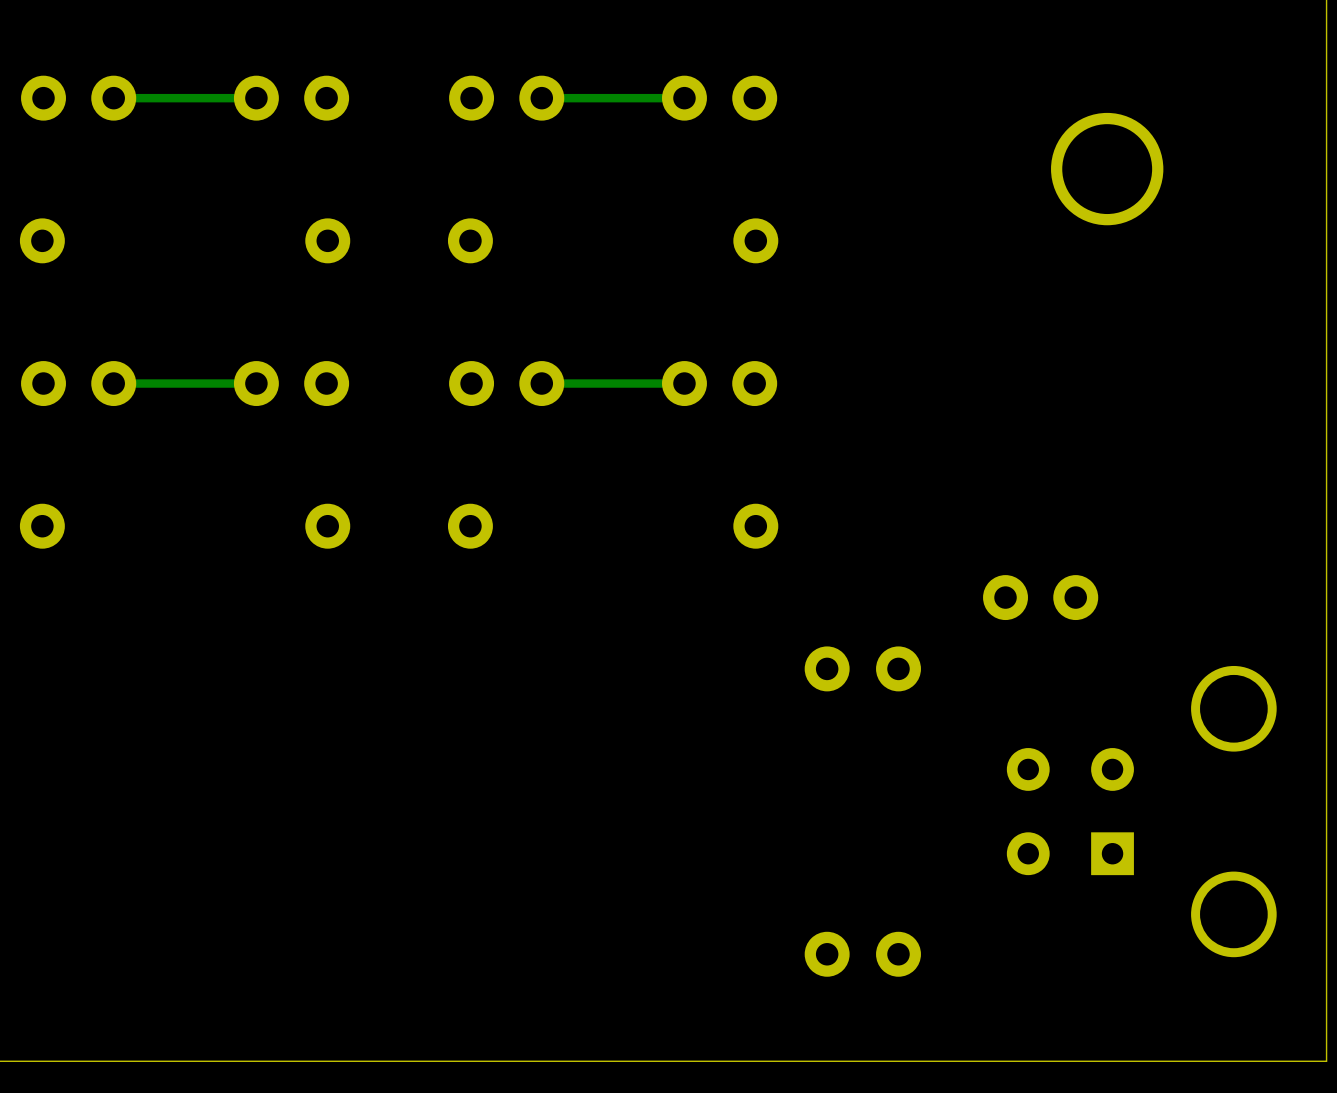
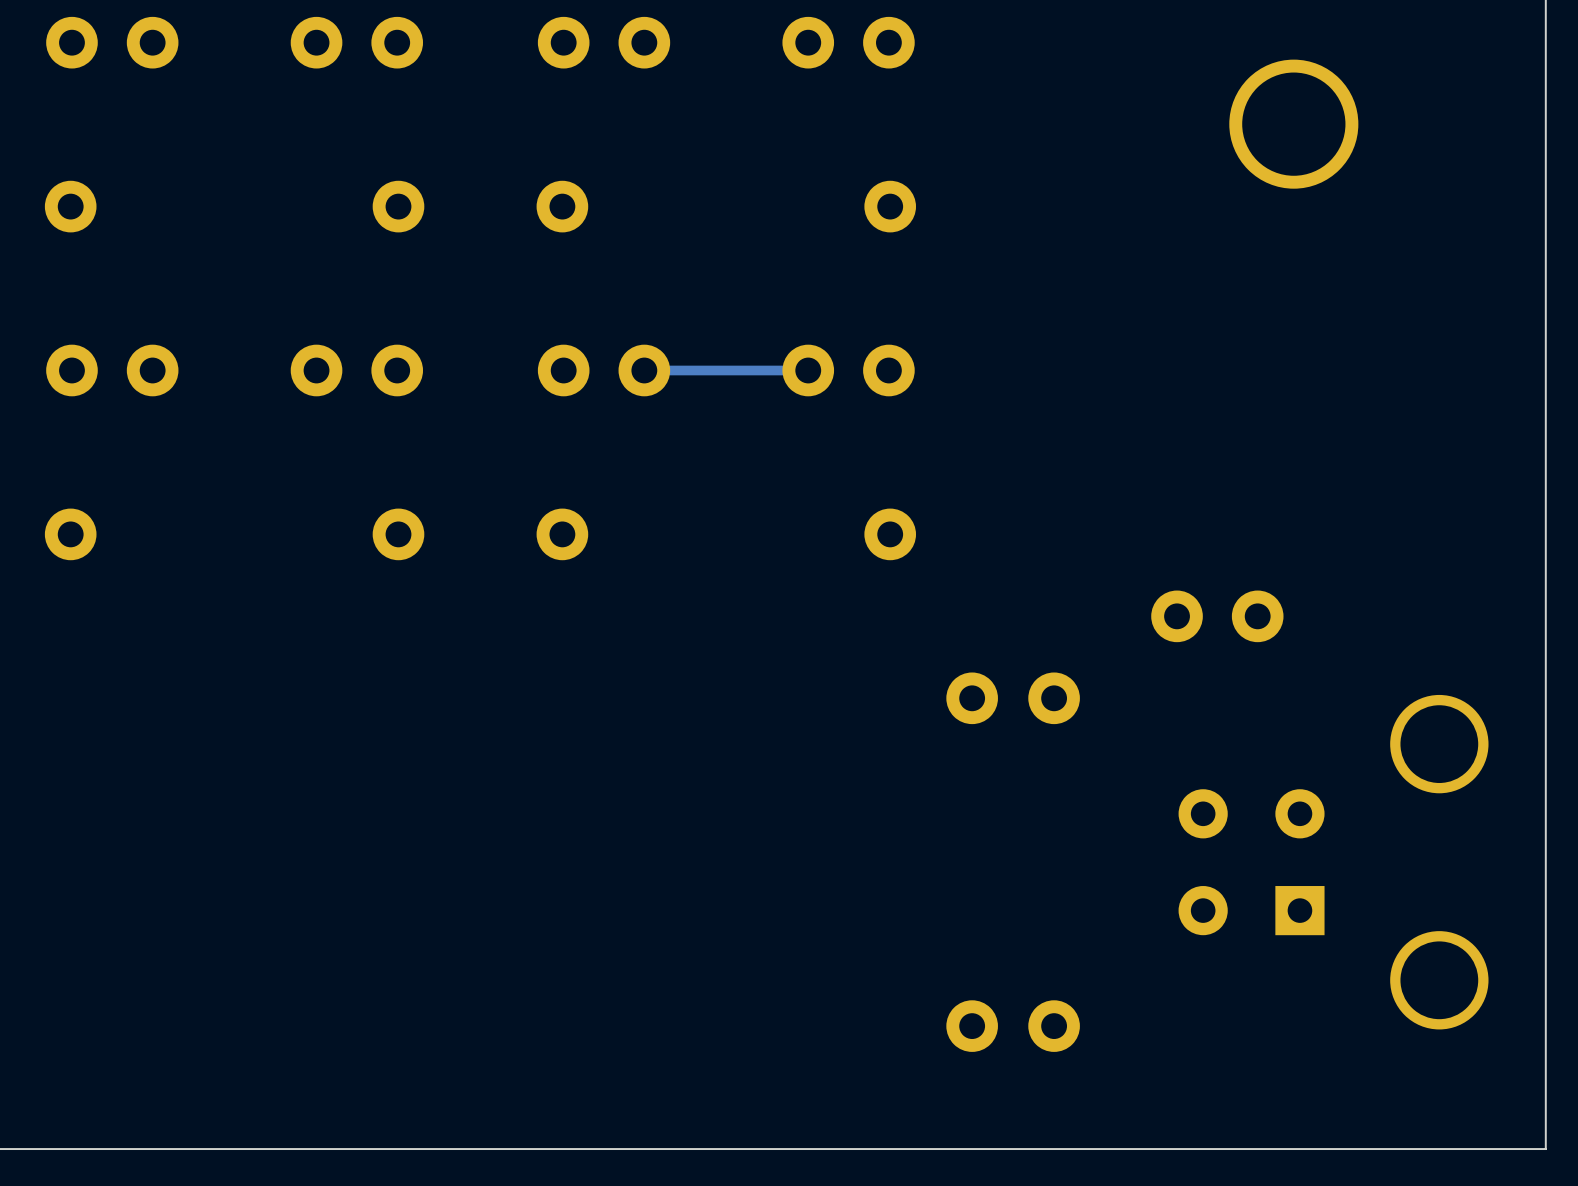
track: (256, 98) (113, 98) -> none
track: (684, 98) (541, 98) -> none
track: (256, 383) (113, 383) -> none

